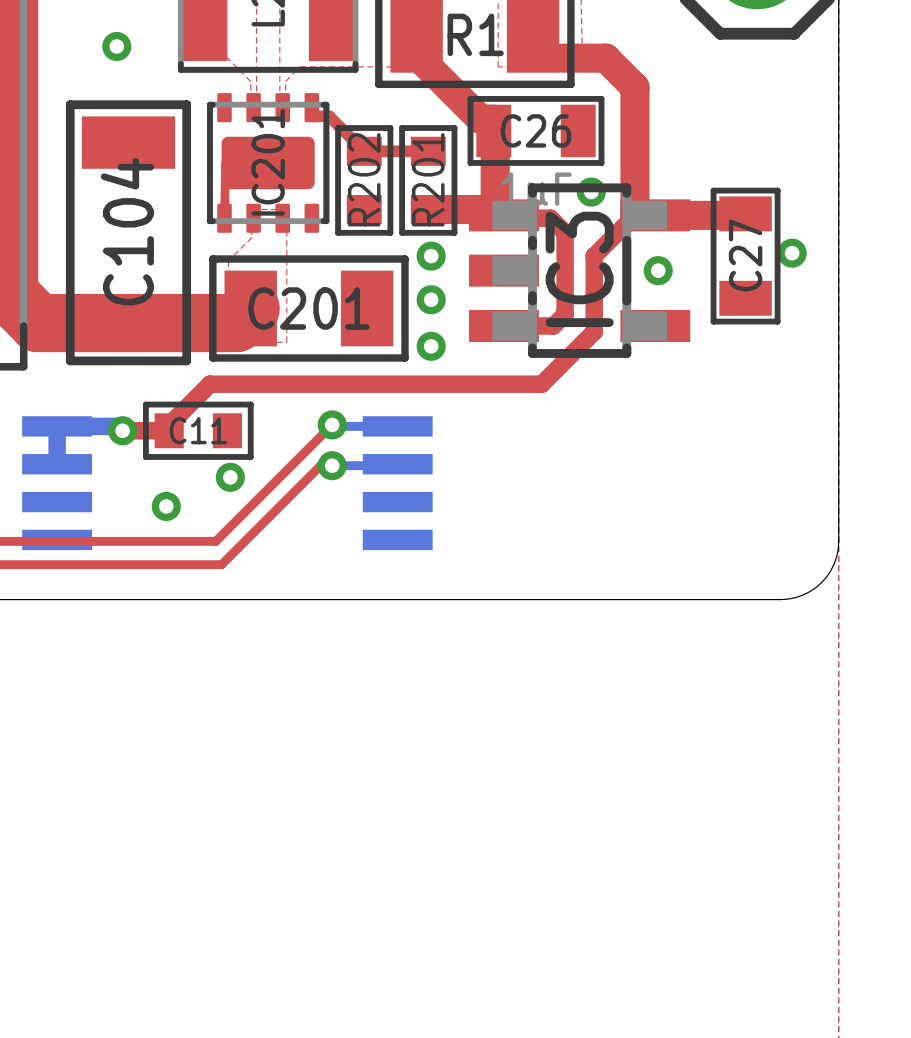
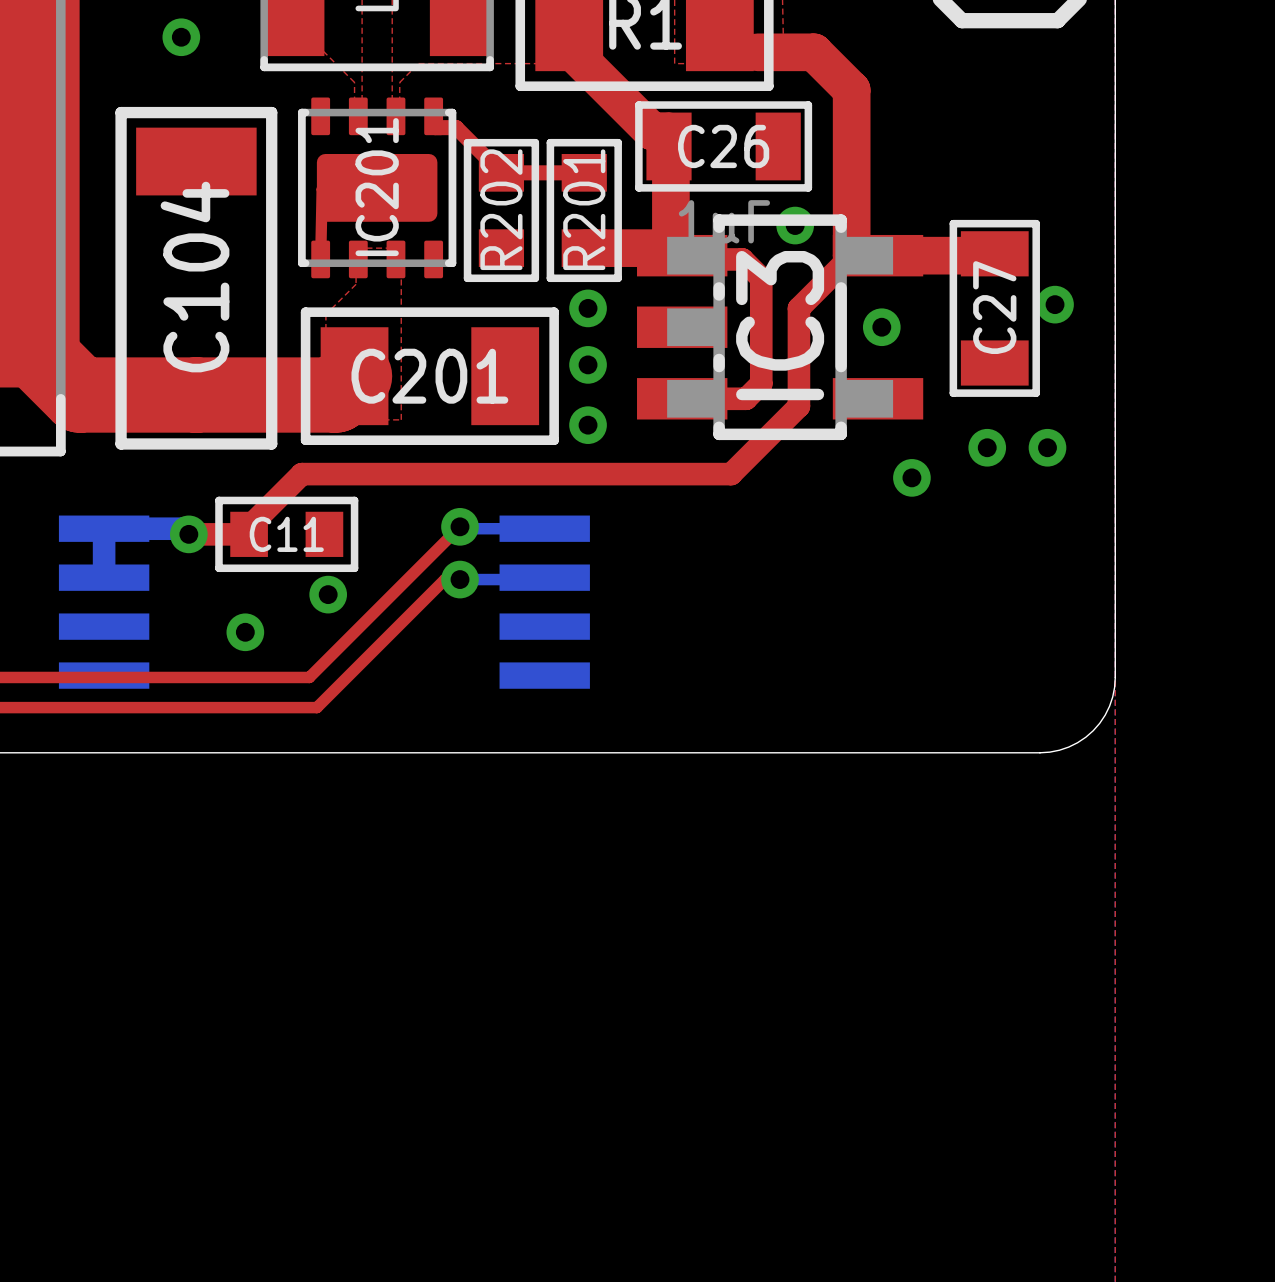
via: none -> (987, 447)
via: none -> (1047, 447)
via: none -> (911, 477)

